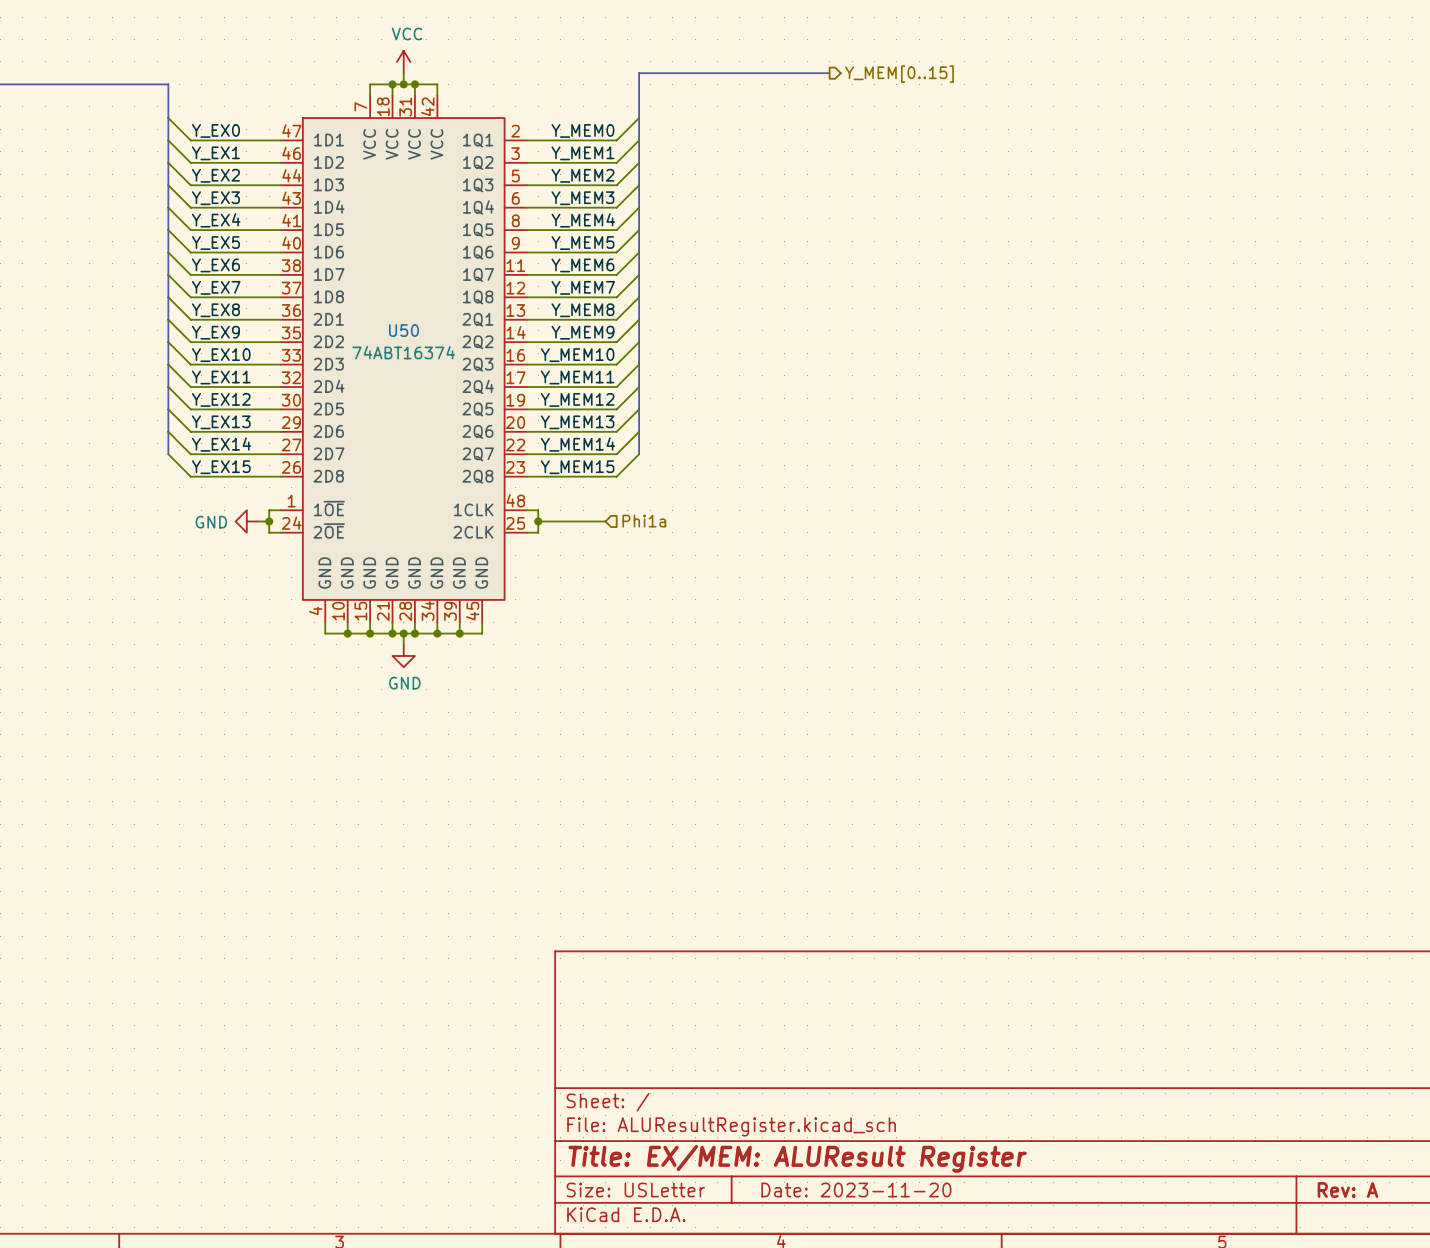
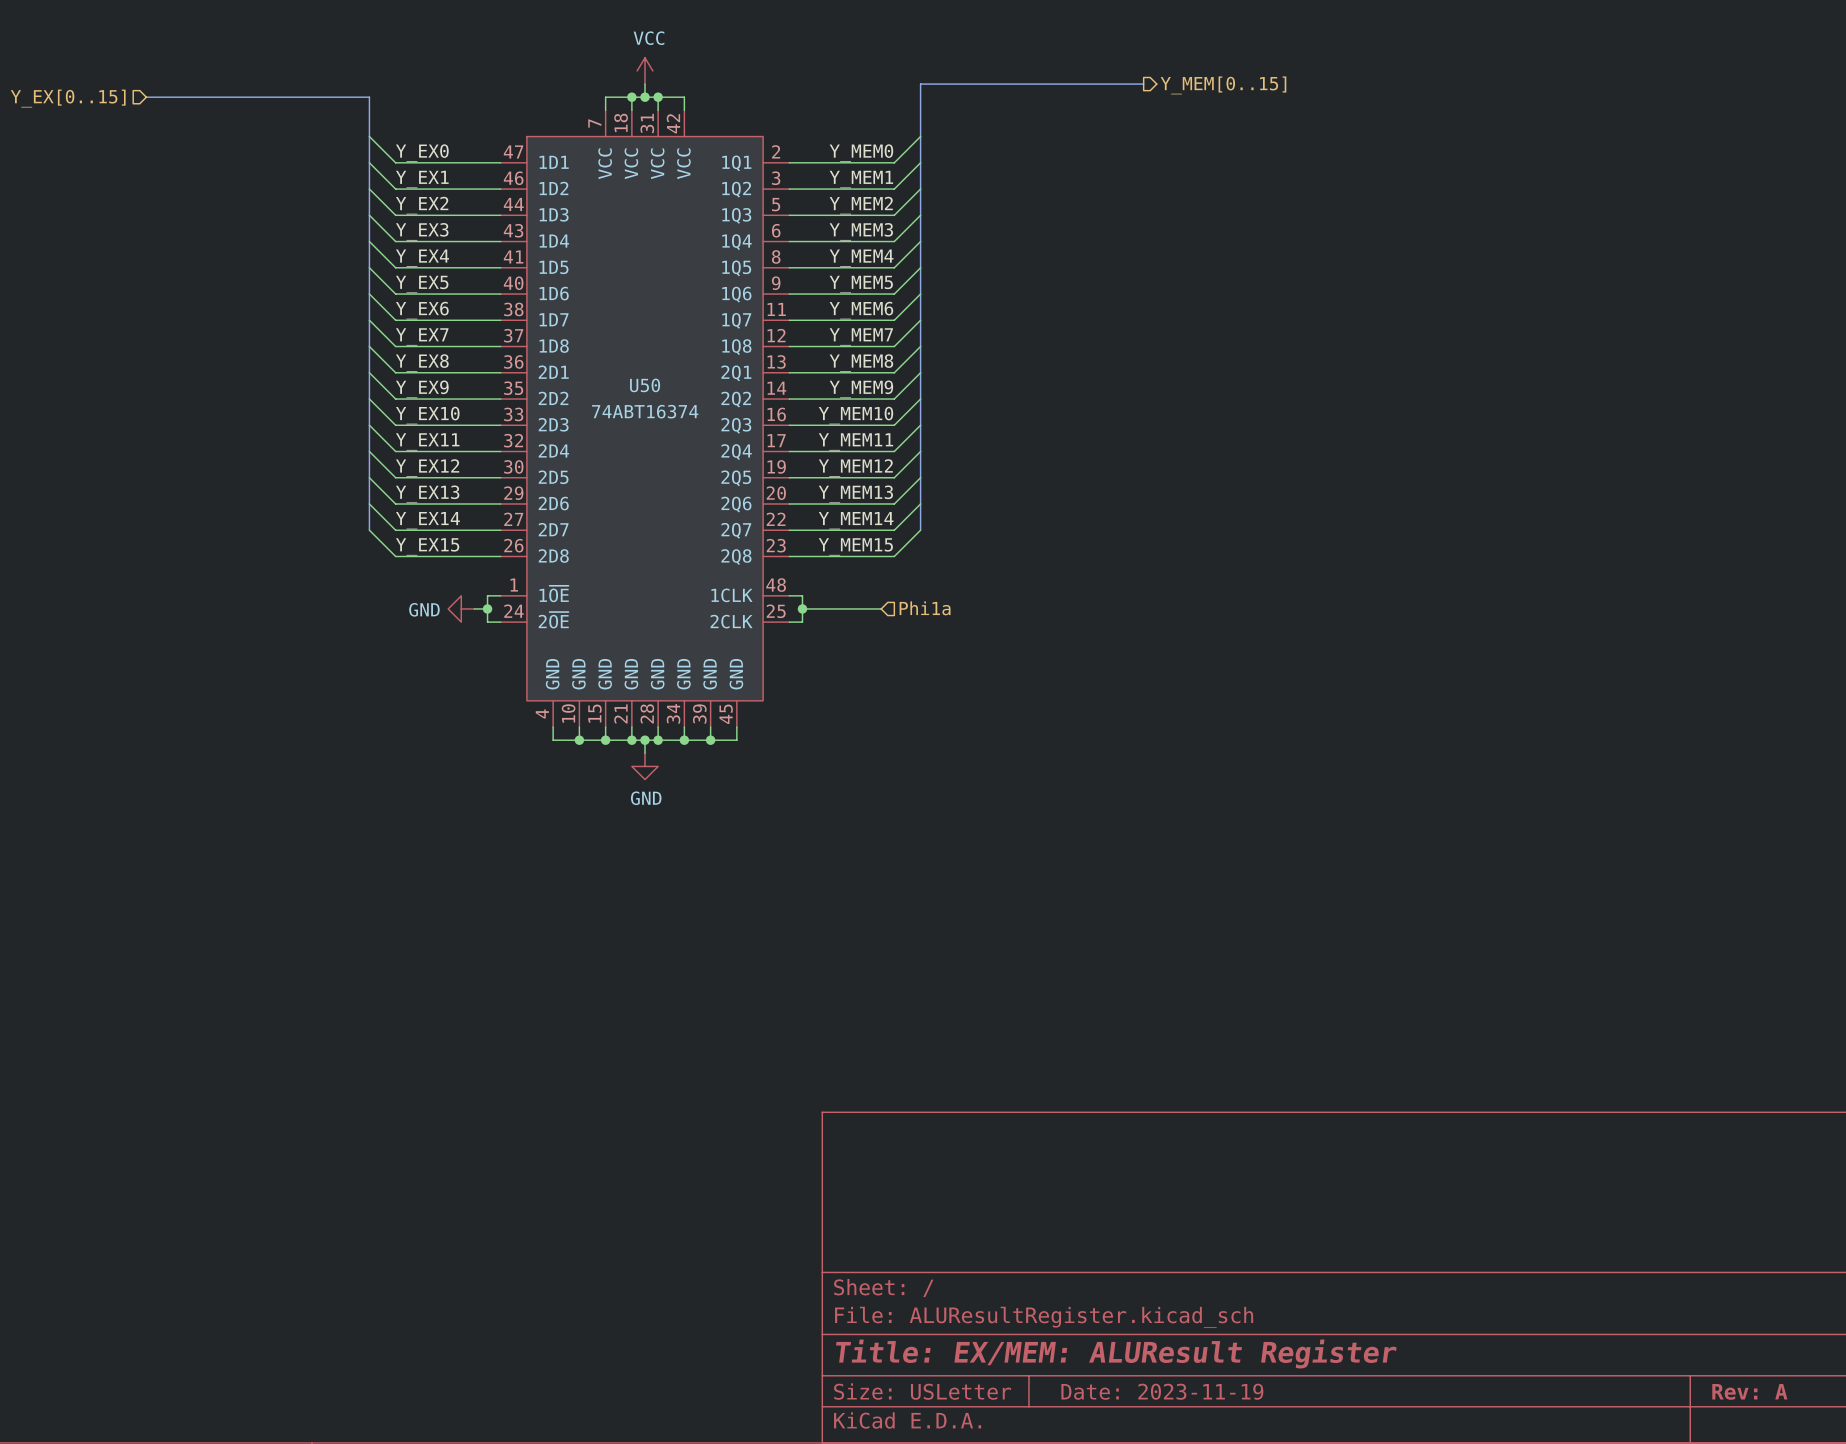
title block: Date: 2023-11-20 (856, 1190) -> Date: 2023-11-19 (1162, 1391)

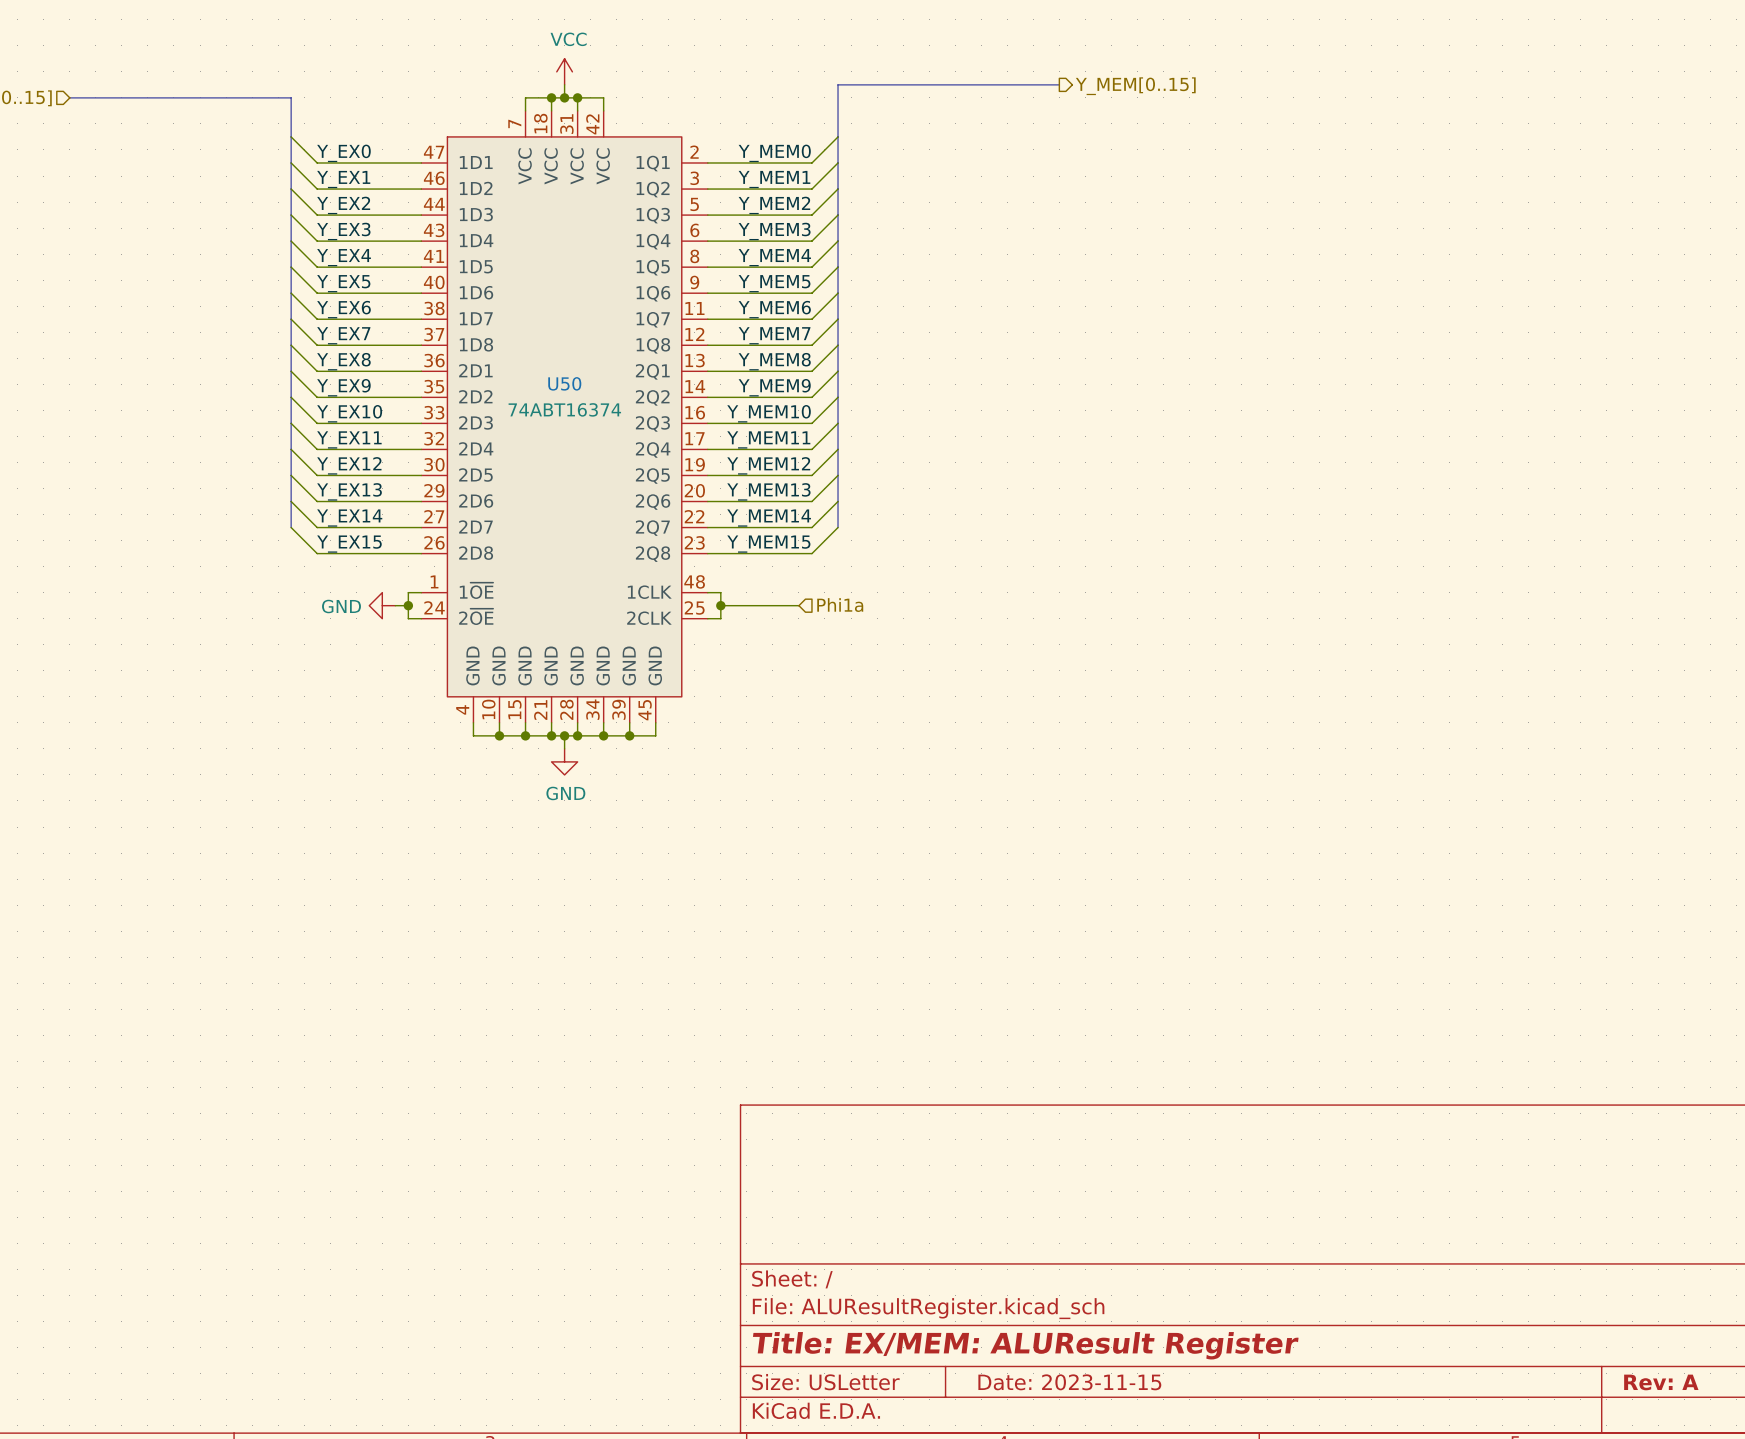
title block: Date: 2023-11-19 (1162, 1391) -> Date: 2023-11-15 (1069, 1382)

